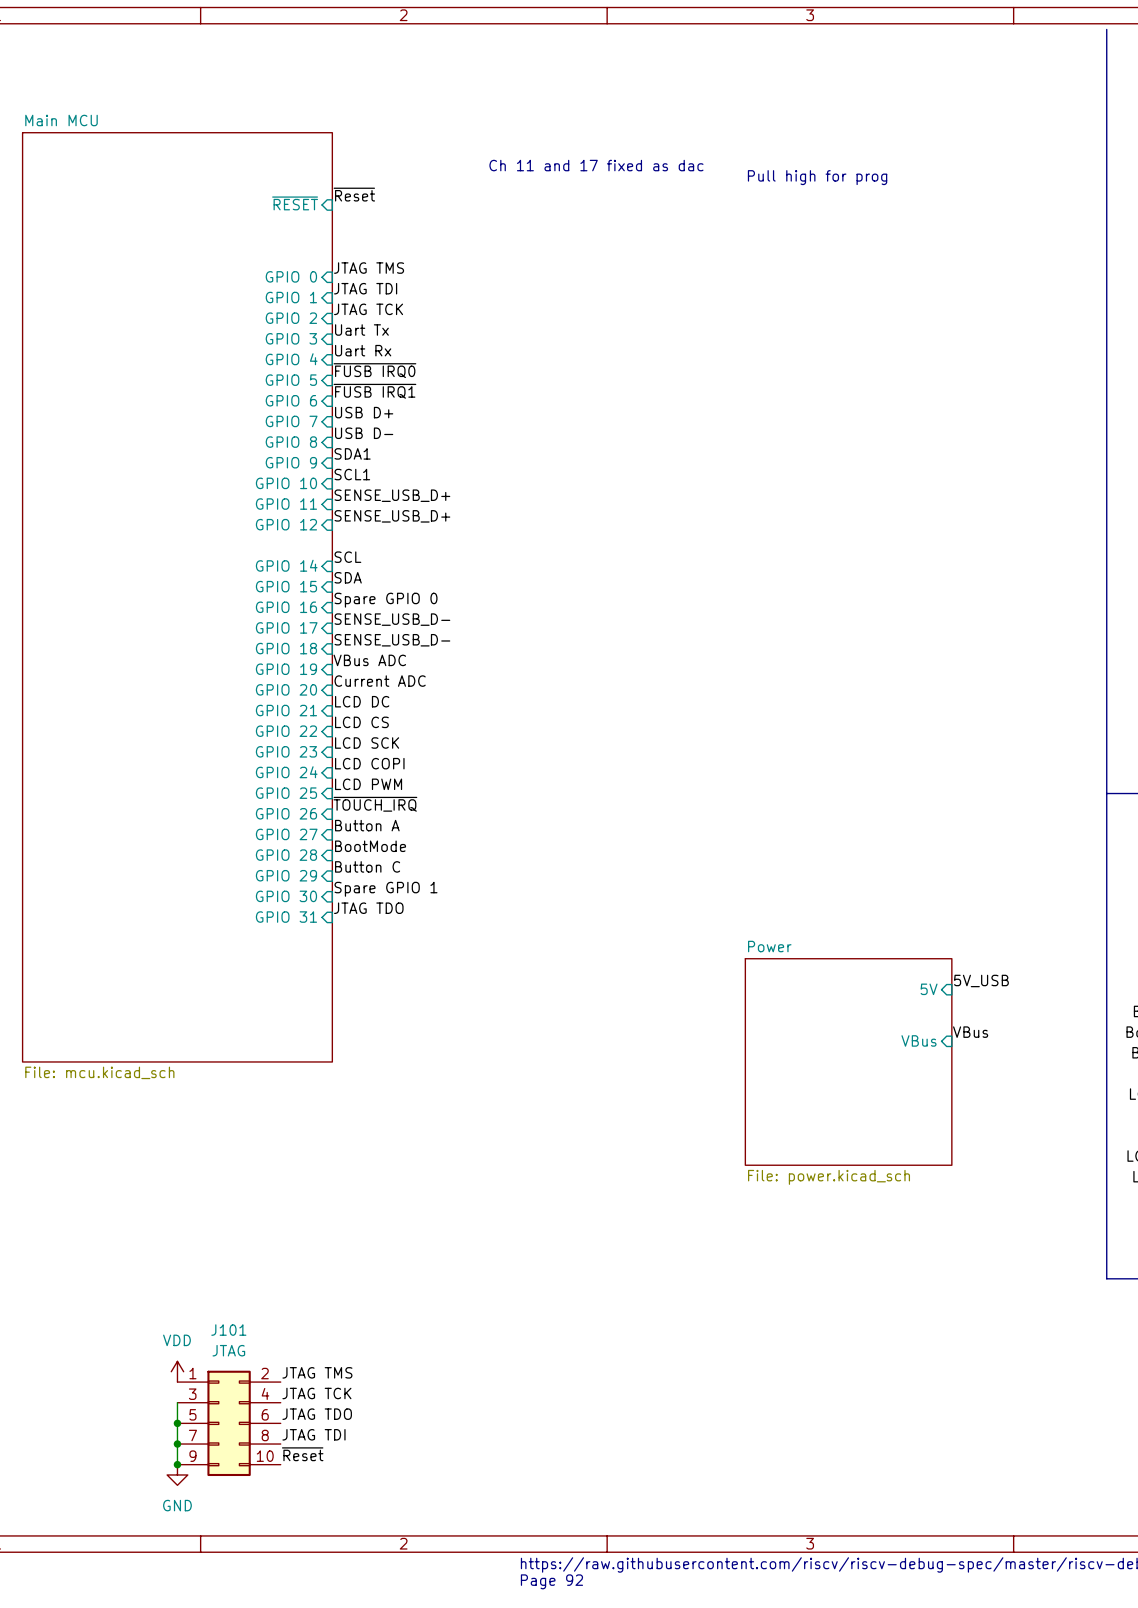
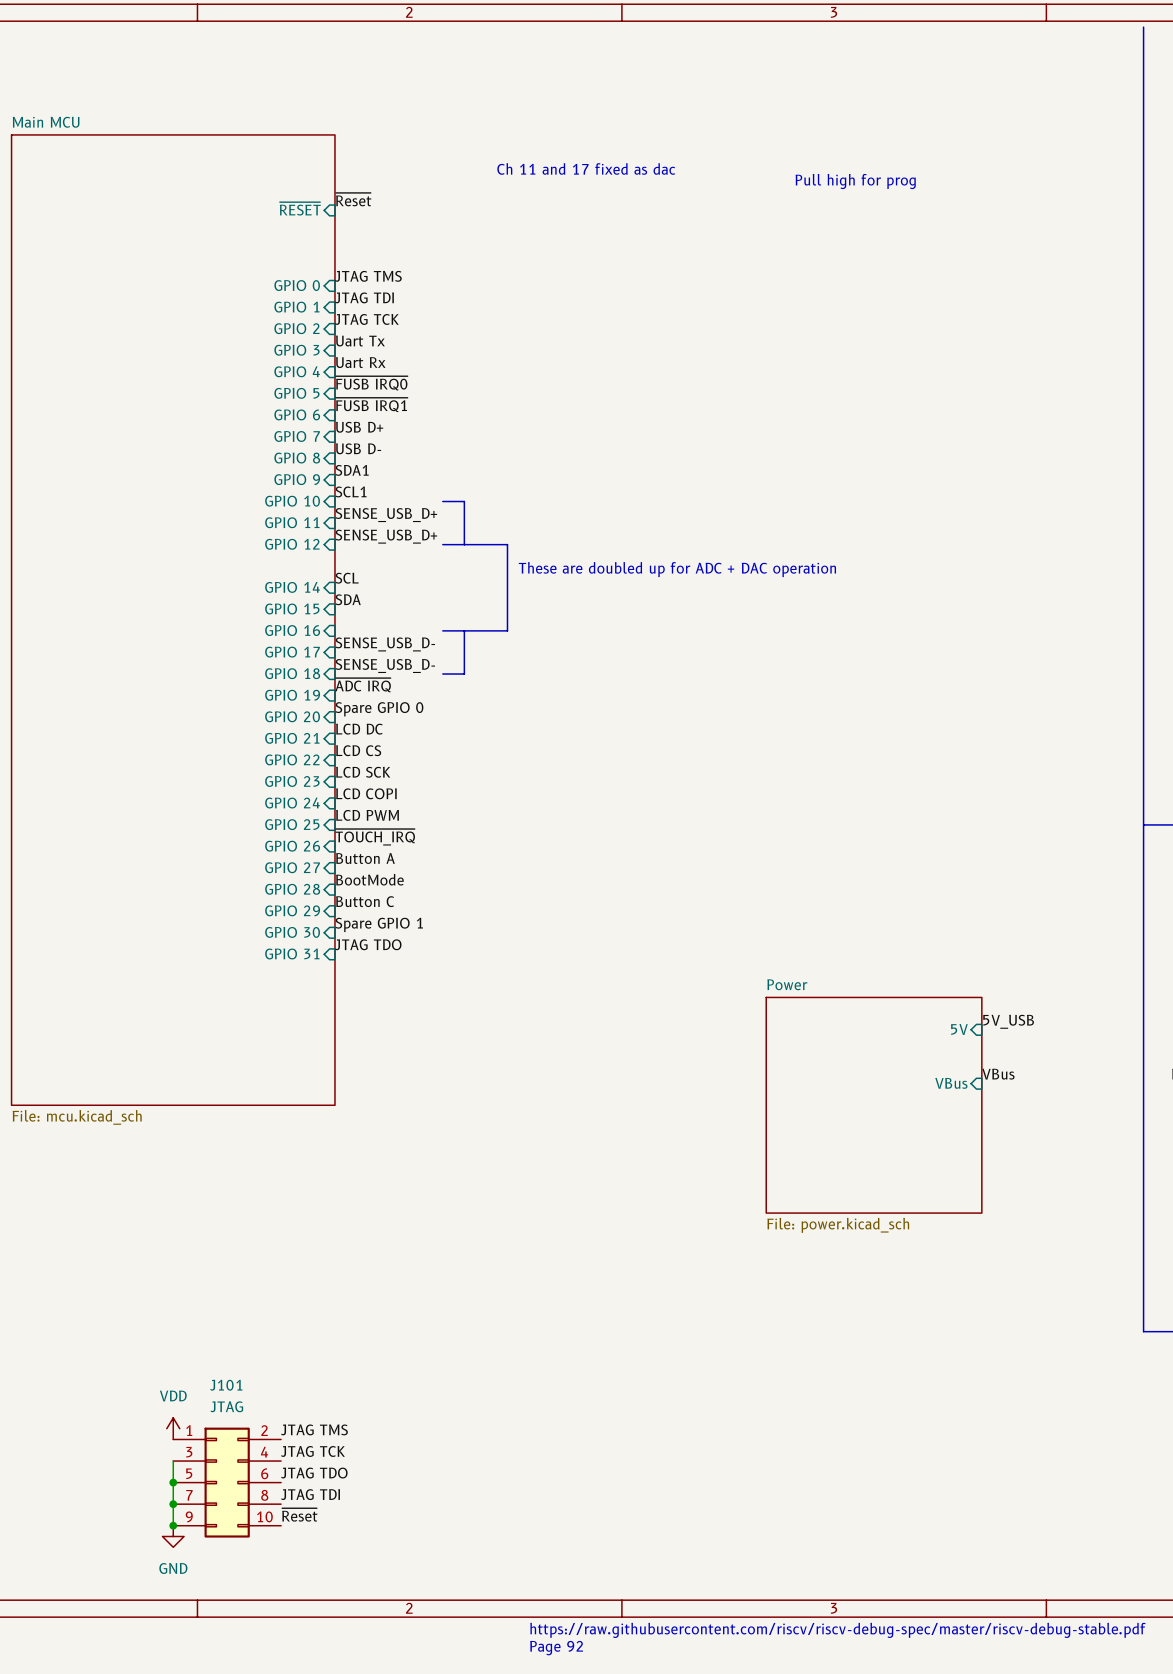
line: none -> (442, 501) (464, 501) (464, 544)
line: none -> (442, 544) (507, 544) (507, 630) (442, 630)
text: none -> These are doubled up for ADC + DAC operation (677, 569)
label: Spare GPIO 0 (386, 600) -> none
line: none -> (464, 630) (464, 674) (442, 674)
label: VBus ADC (369, 660) -> ~{ADC IRQ} (363, 685)
label: Current ADC (380, 681) -> Spare GPIO 0 (379, 709)

